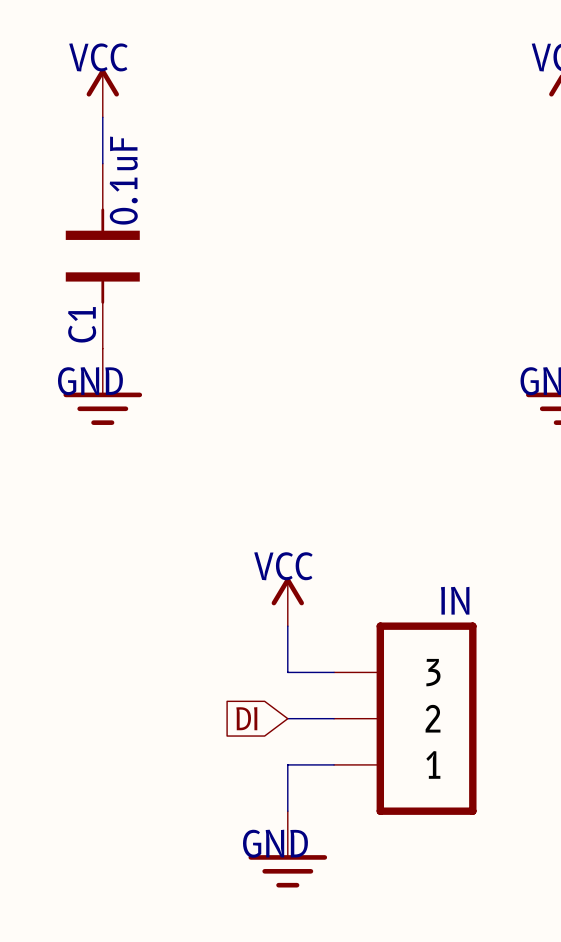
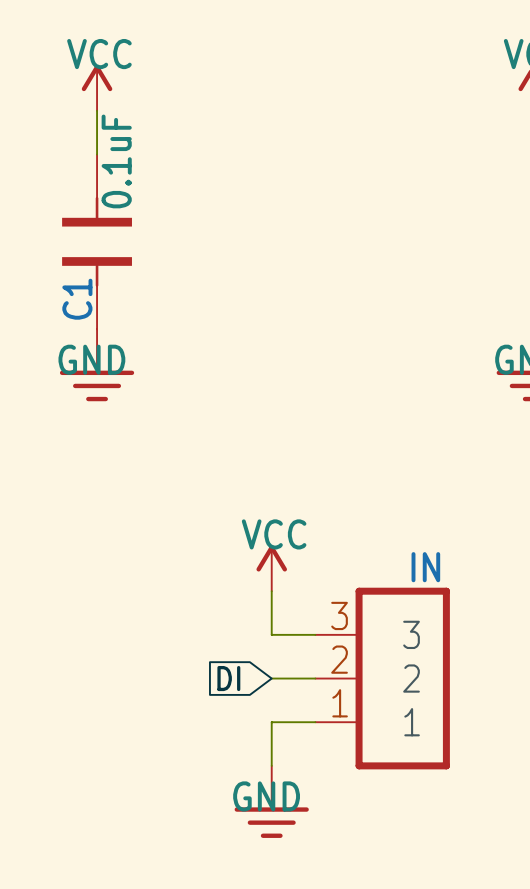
IN pin number: none -> 3 (339, 615)
IN pin number: none -> 2 (339, 659)
IN pin number: none -> 1 (340, 703)

